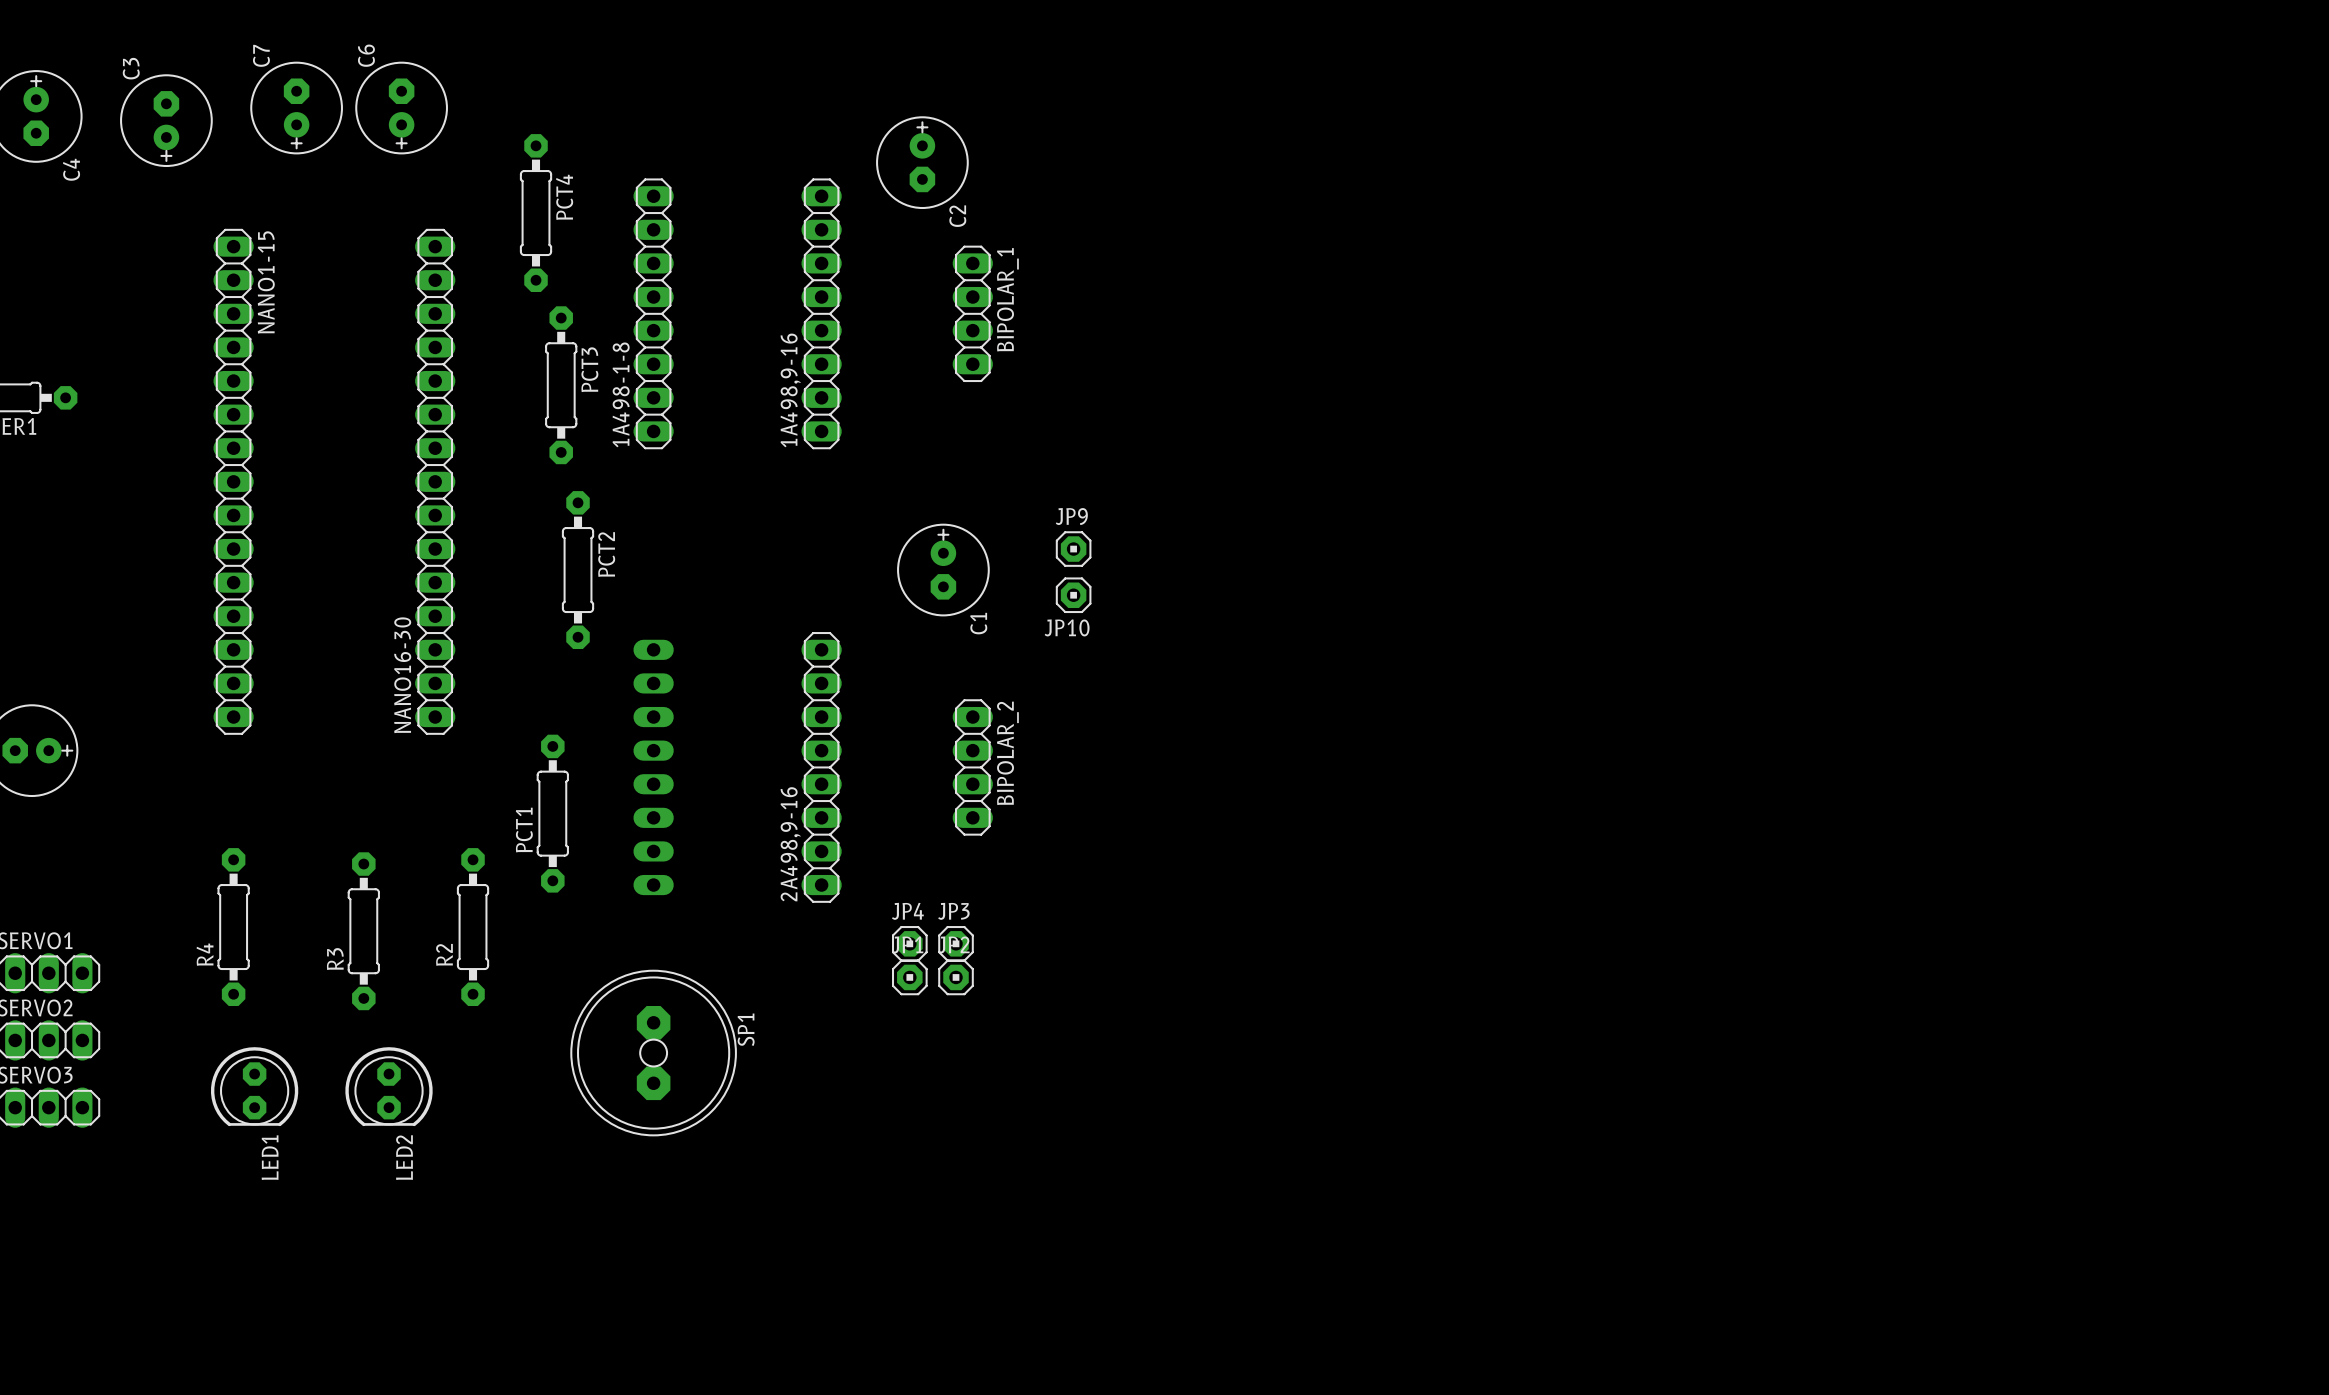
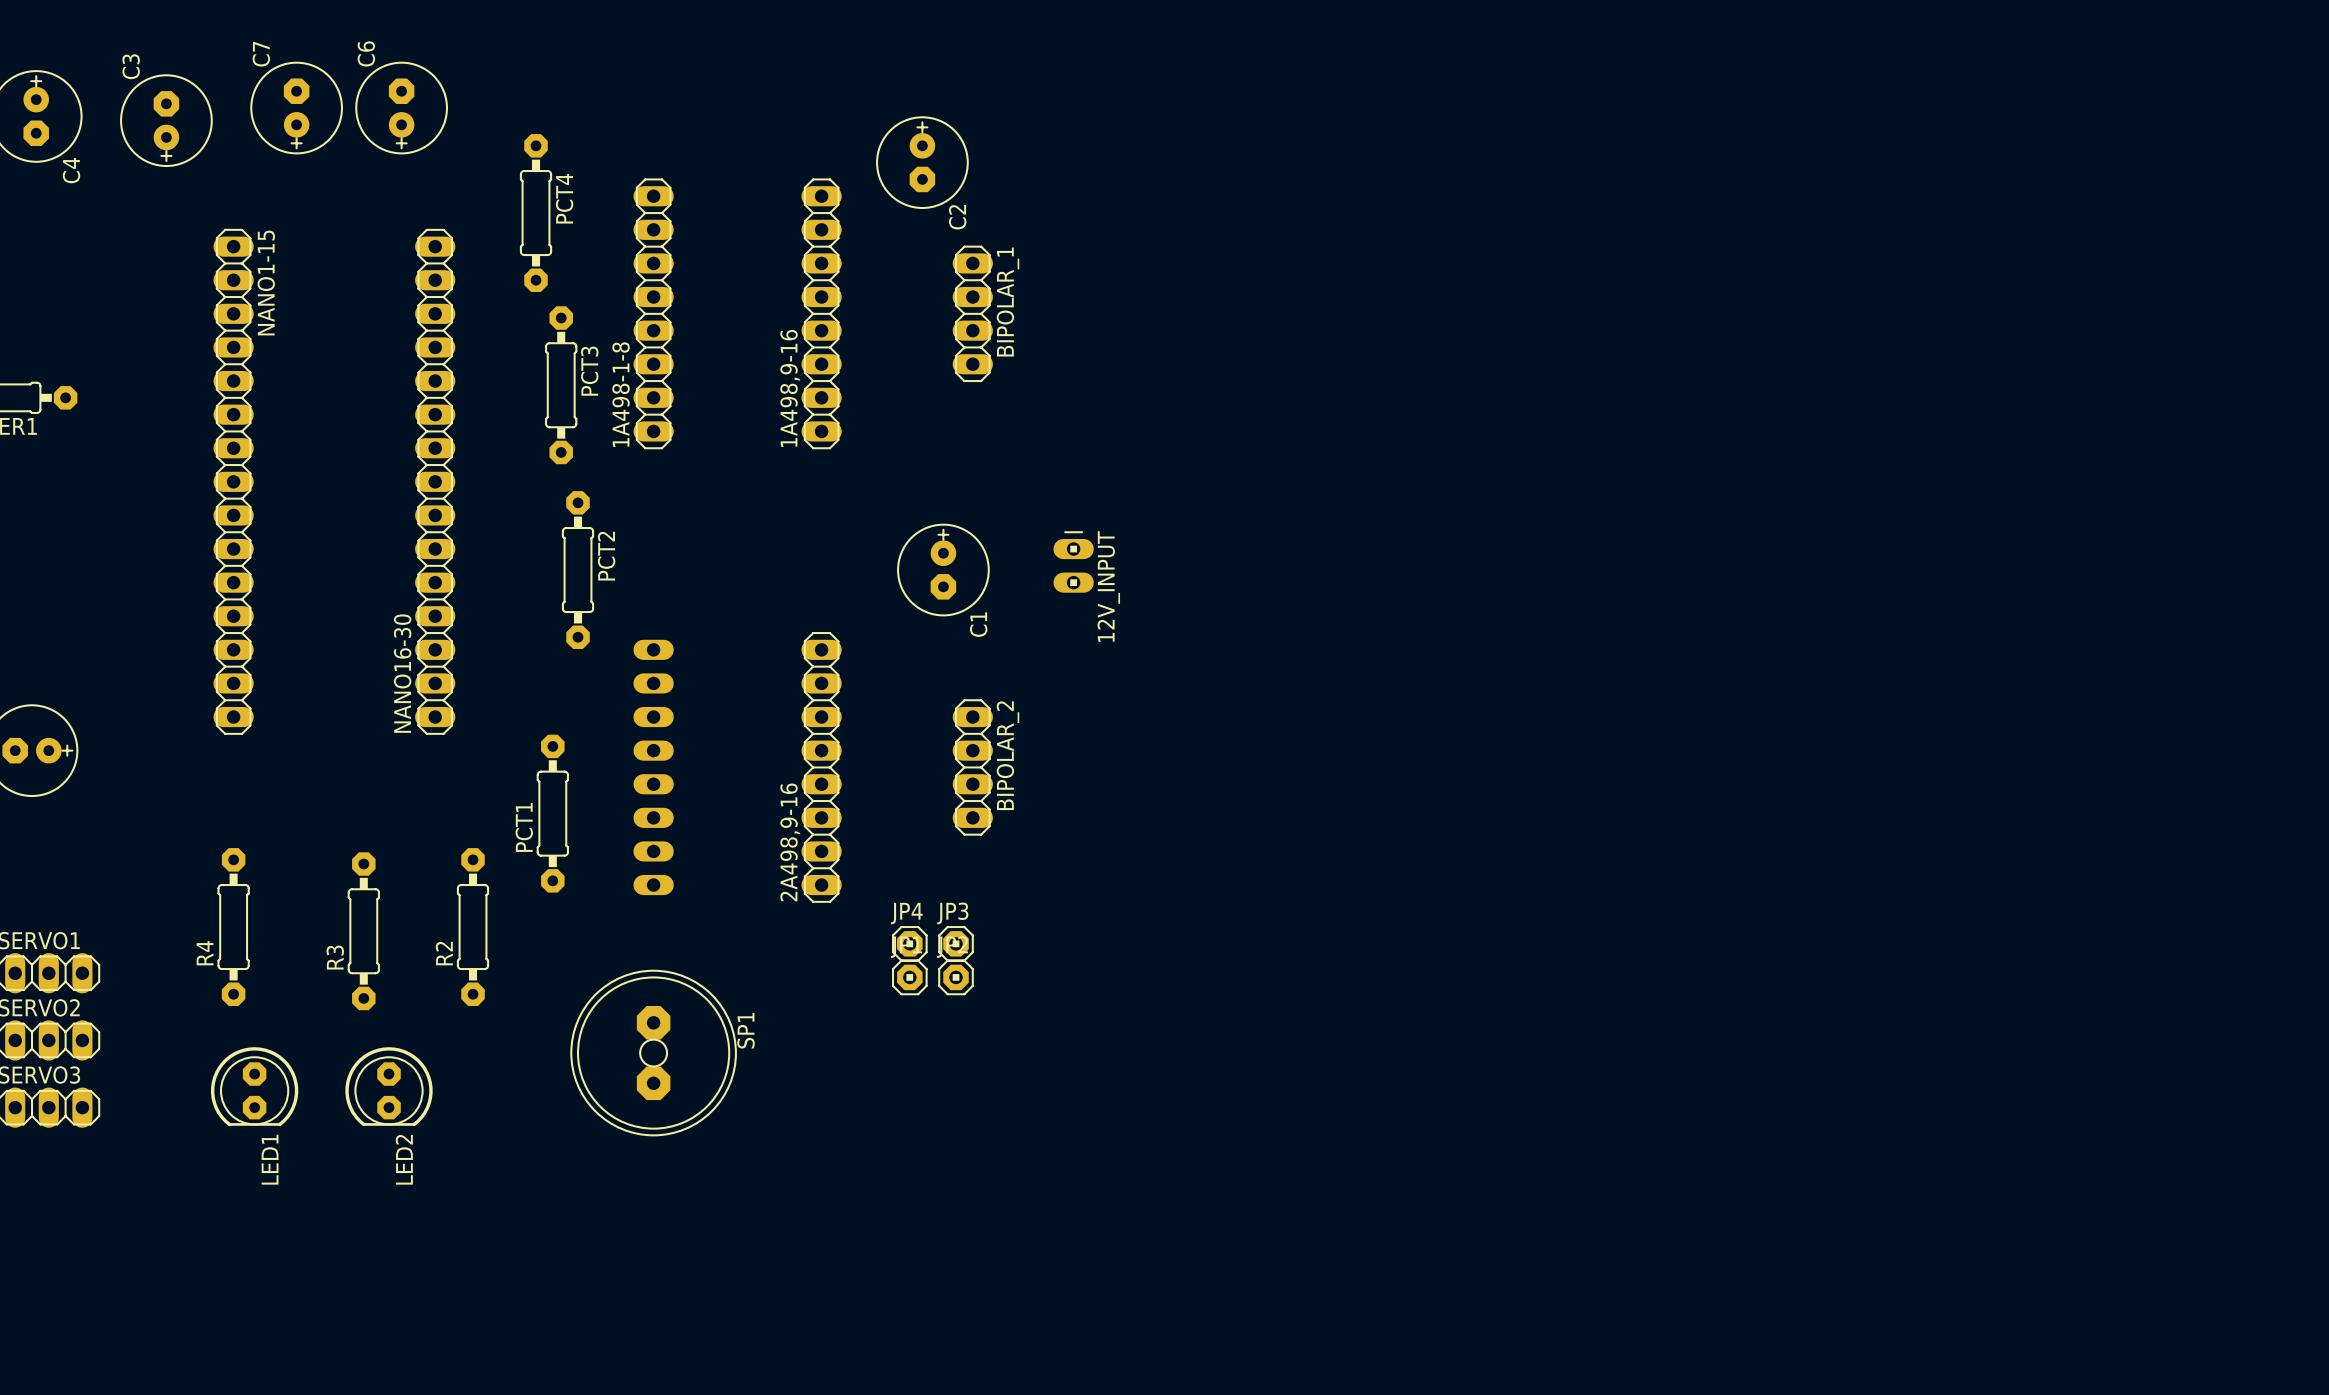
JP9: (1073, 549) -> none
12V_INPUT: none -> (1073, 561)
JP10: (1073, 595) -> none

